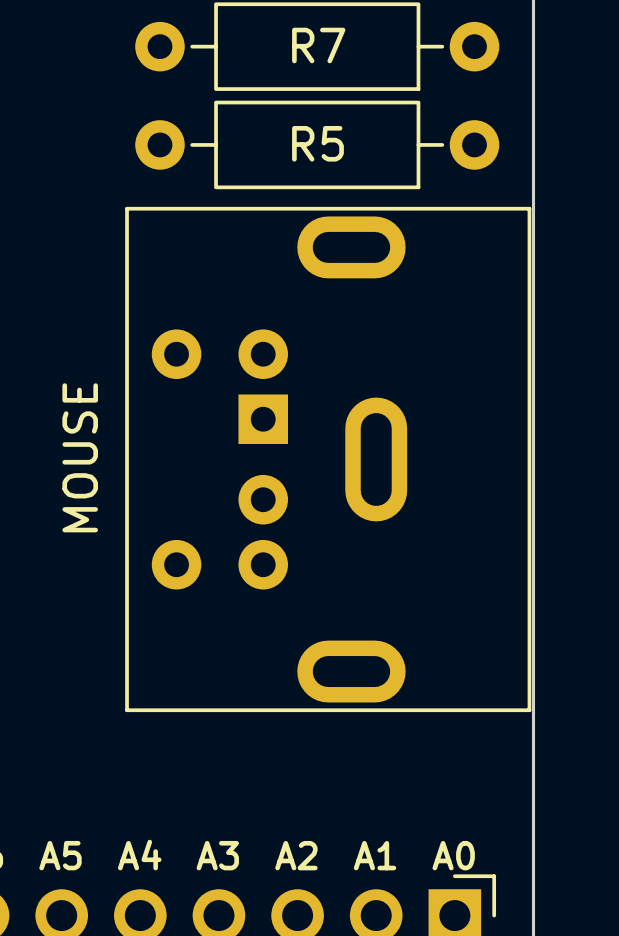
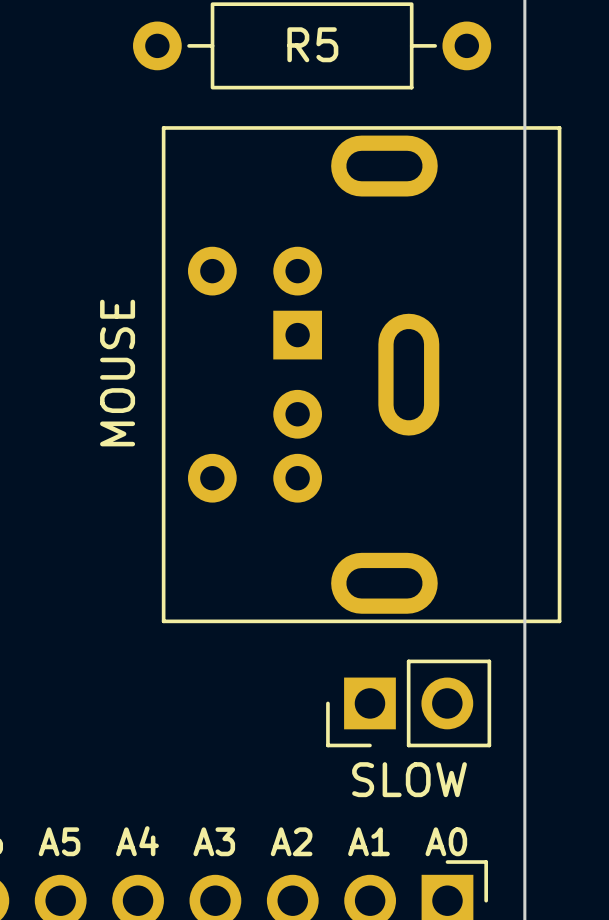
R7 name: R7 (318, 45) -> R5 (312, 44)
R5: (317, 144) -> none
MOUSE position: (328, 459) -> (361, 374)
SLOW: none -> (408, 703)

